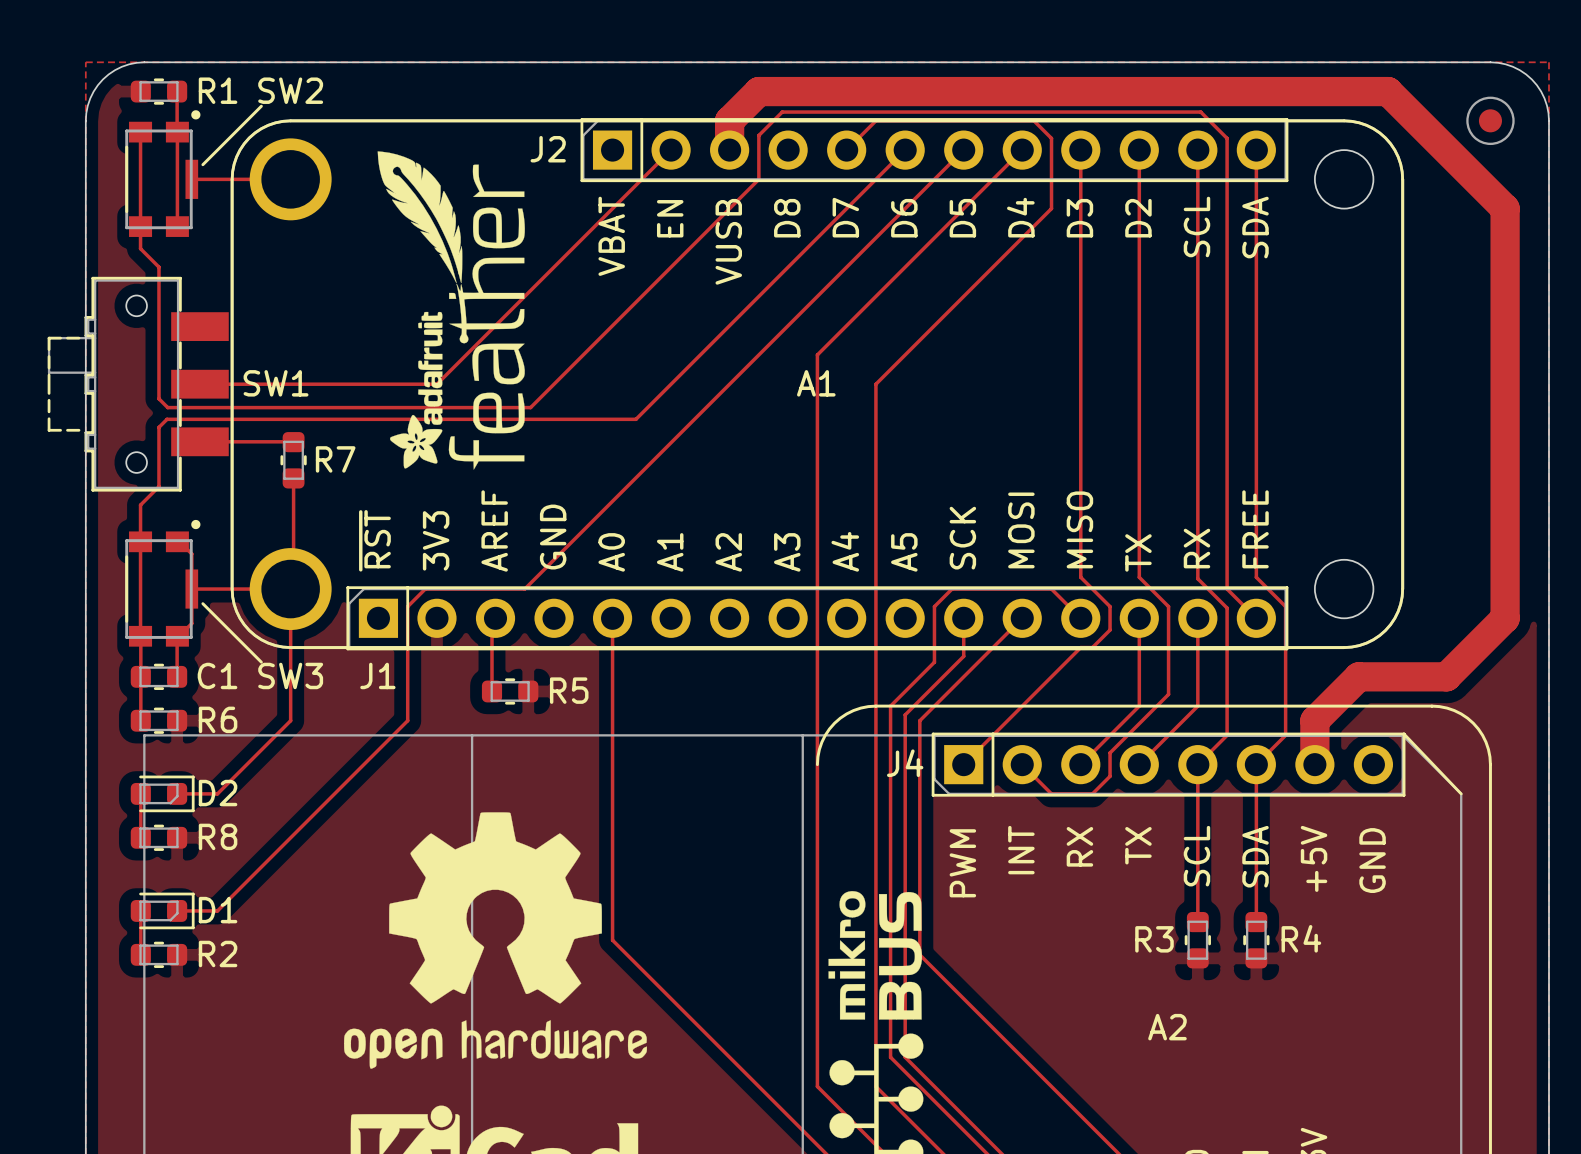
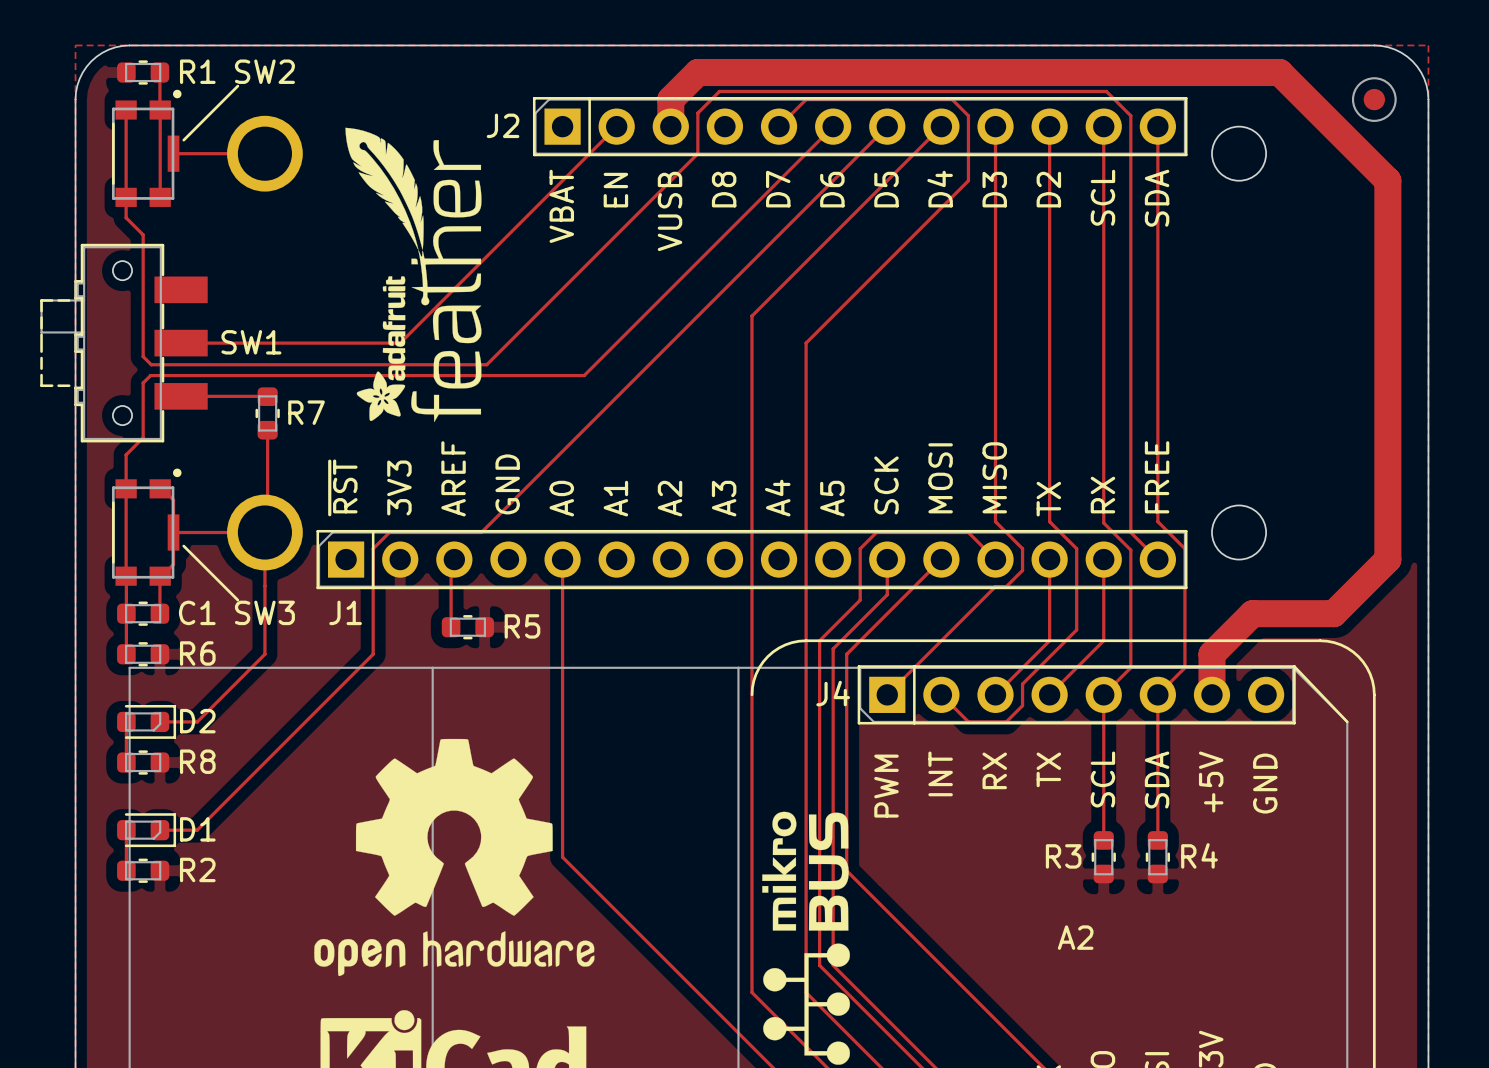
A1: (817, 384) -> none

